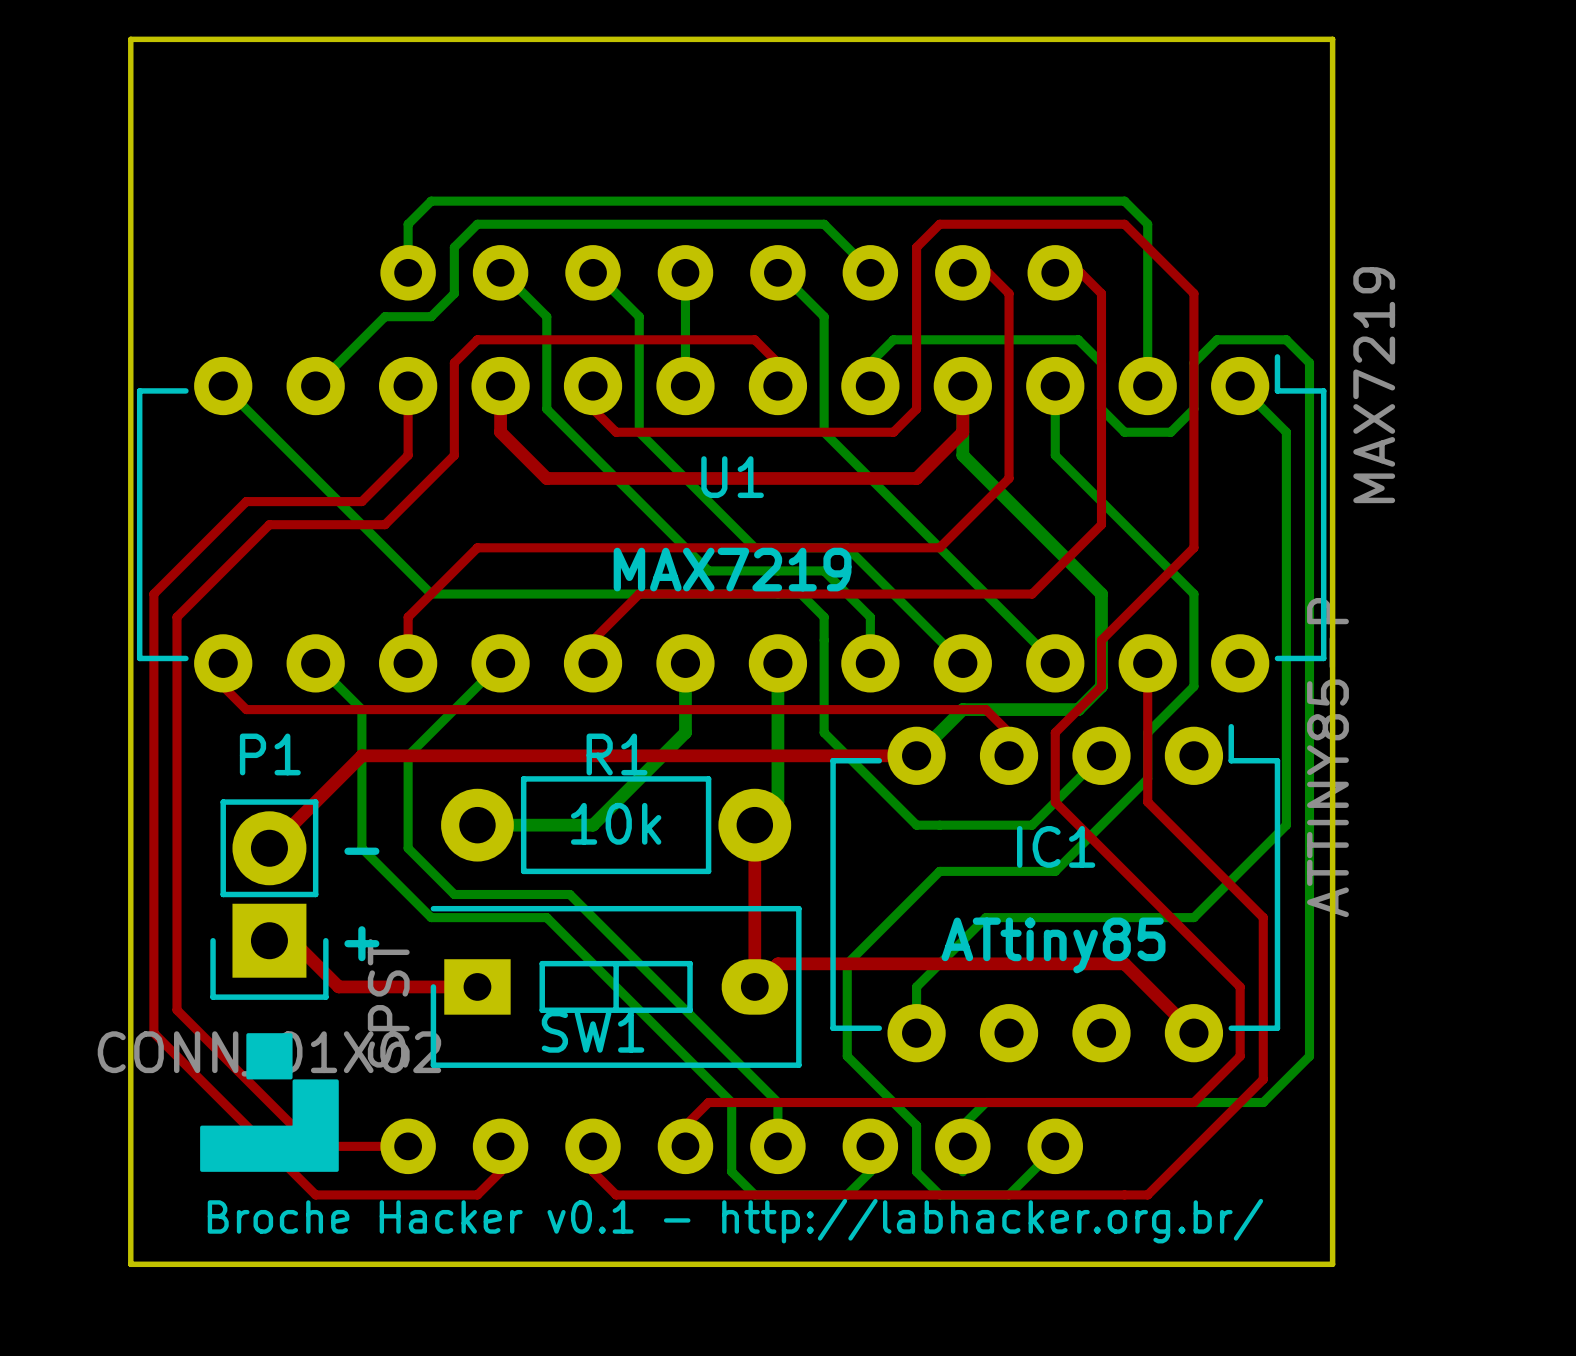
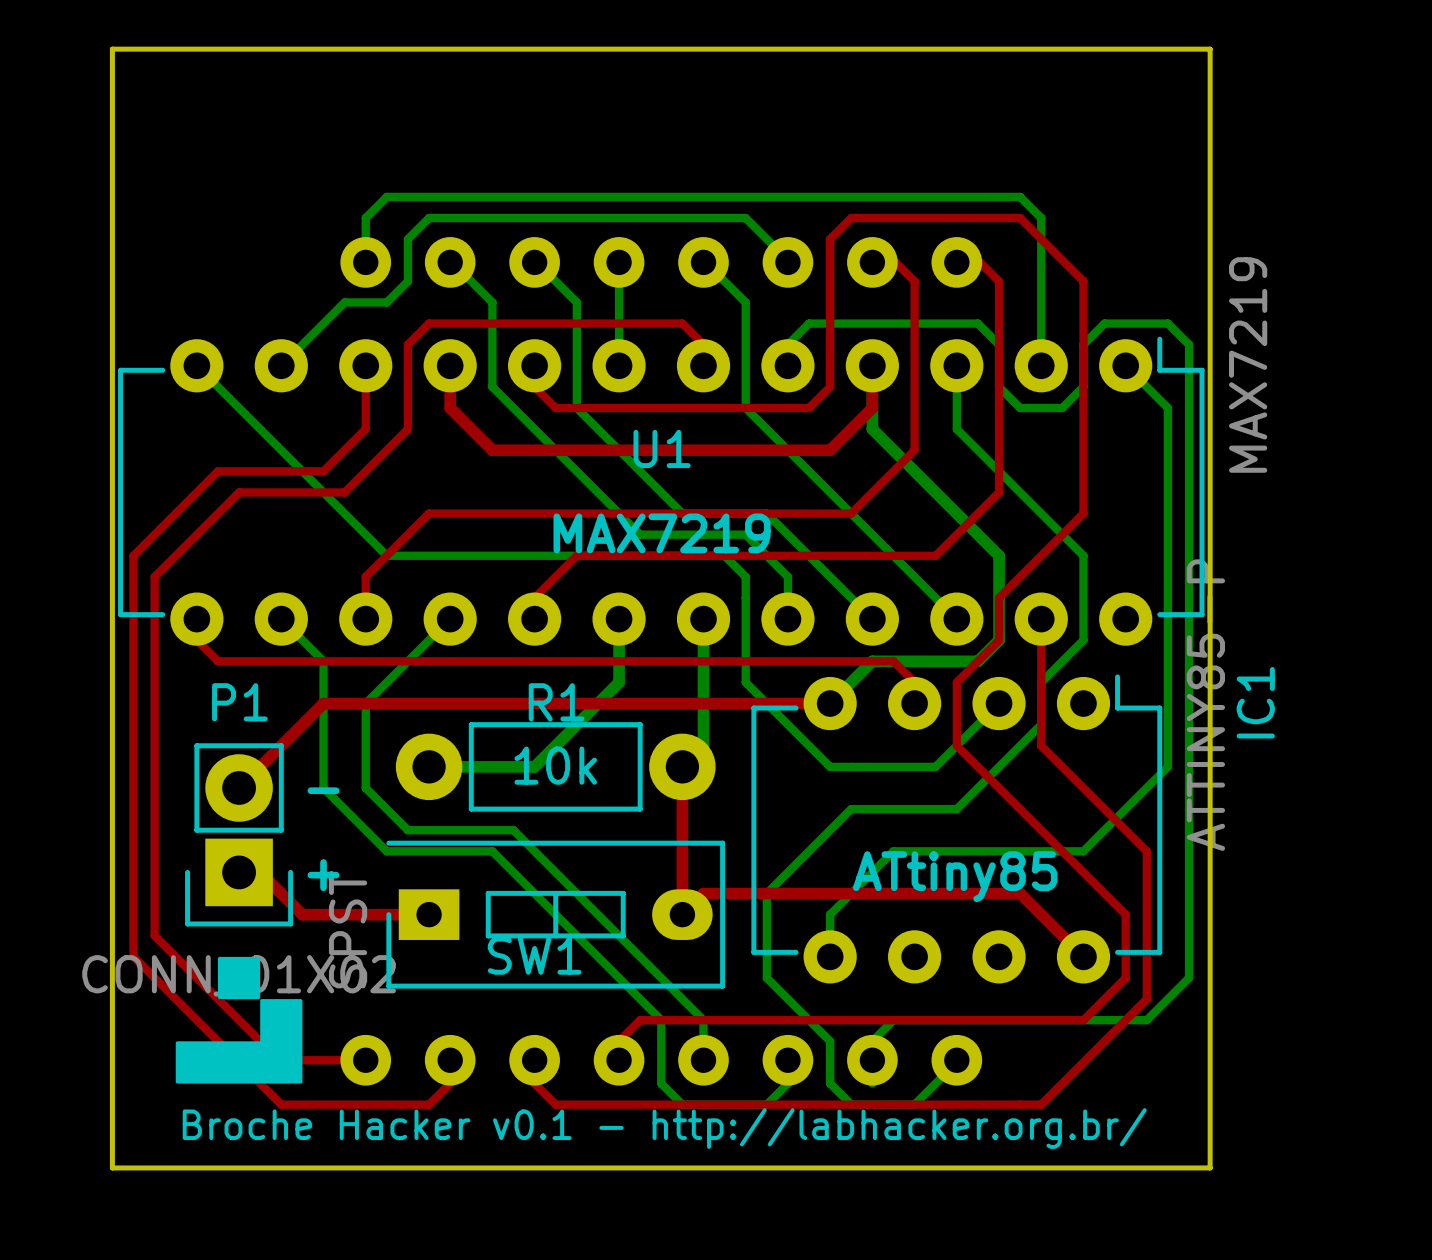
IC1 name rotation: 0° (1056, 846) -> 90° counterclockwise (1255, 702)
IC1 name position: IC1 (1056, 846) -> IC1 (1255, 702)

